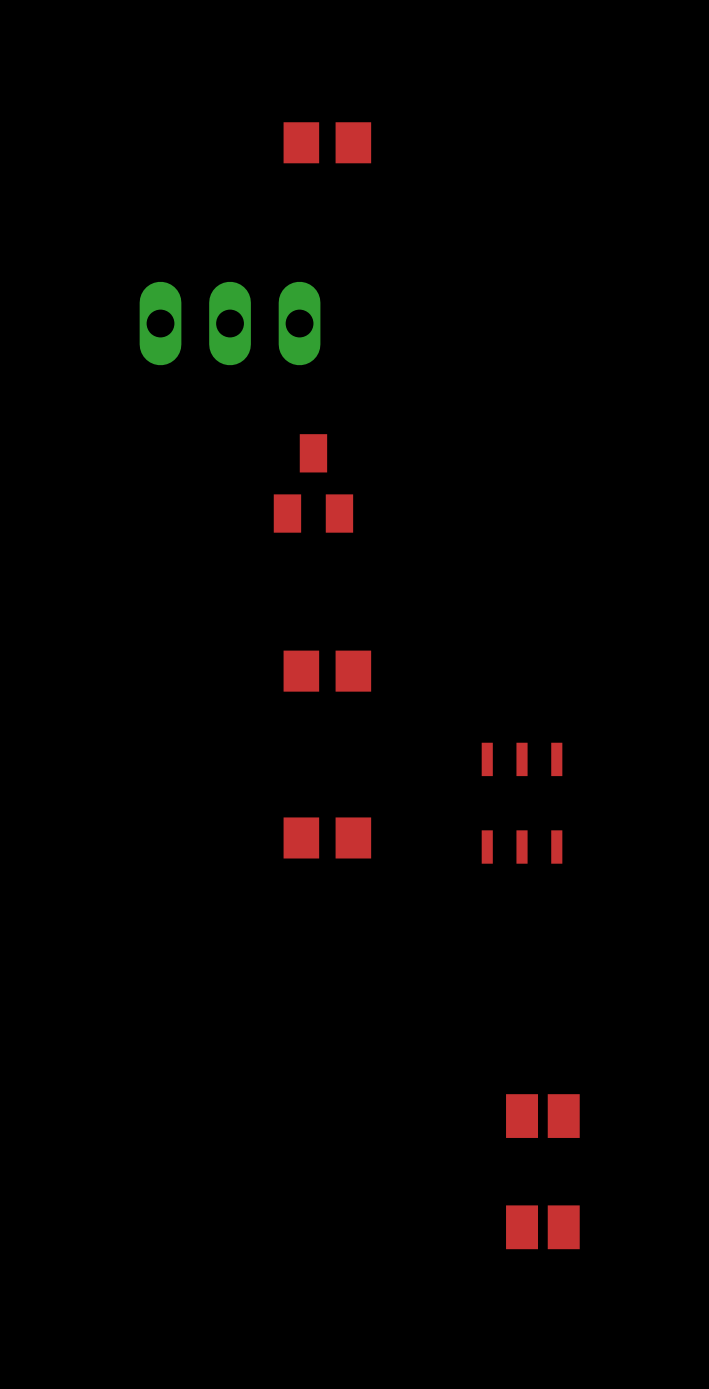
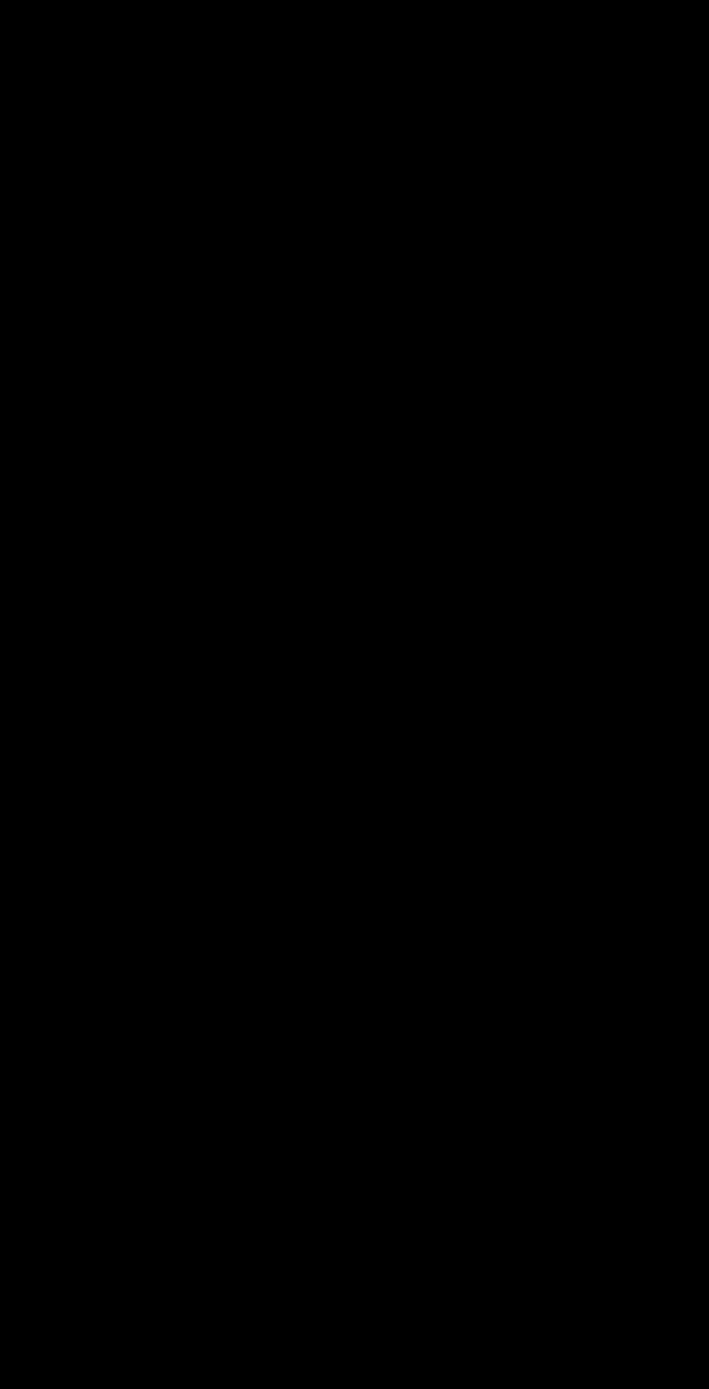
part: (327, 142) -> none
part: (230, 323) -> none
part: (313, 483) -> none
part: (327, 671) -> none
part: (522, 803) -> none
part: (327, 837) -> none
part: (542, 1116) -> none
part: (542, 1227) -> none

